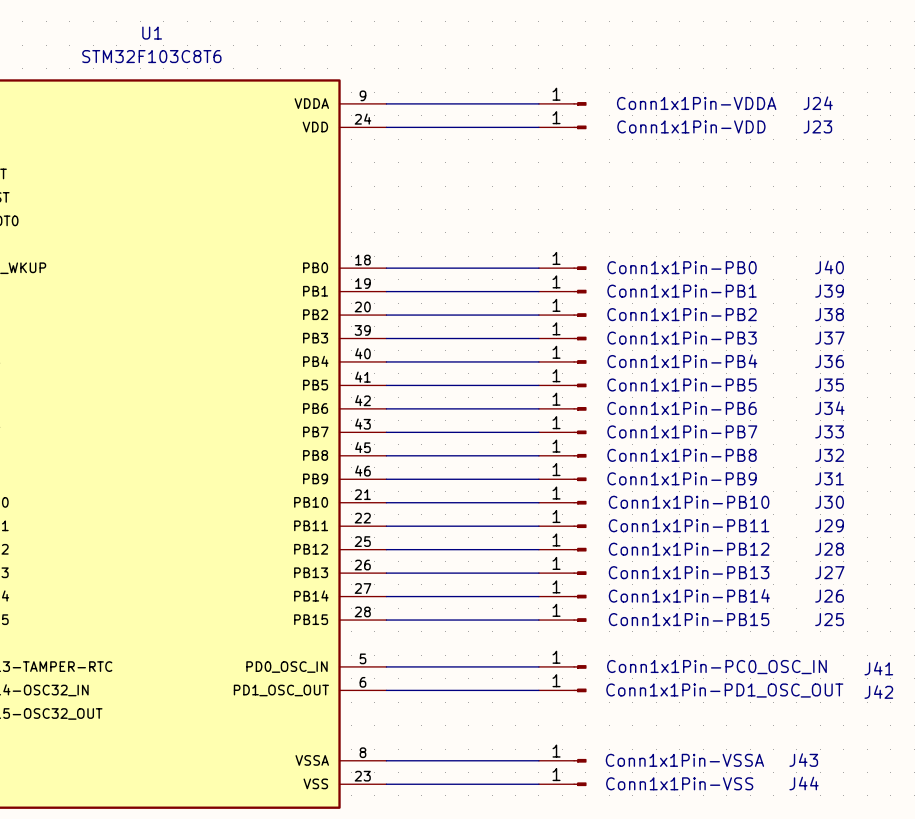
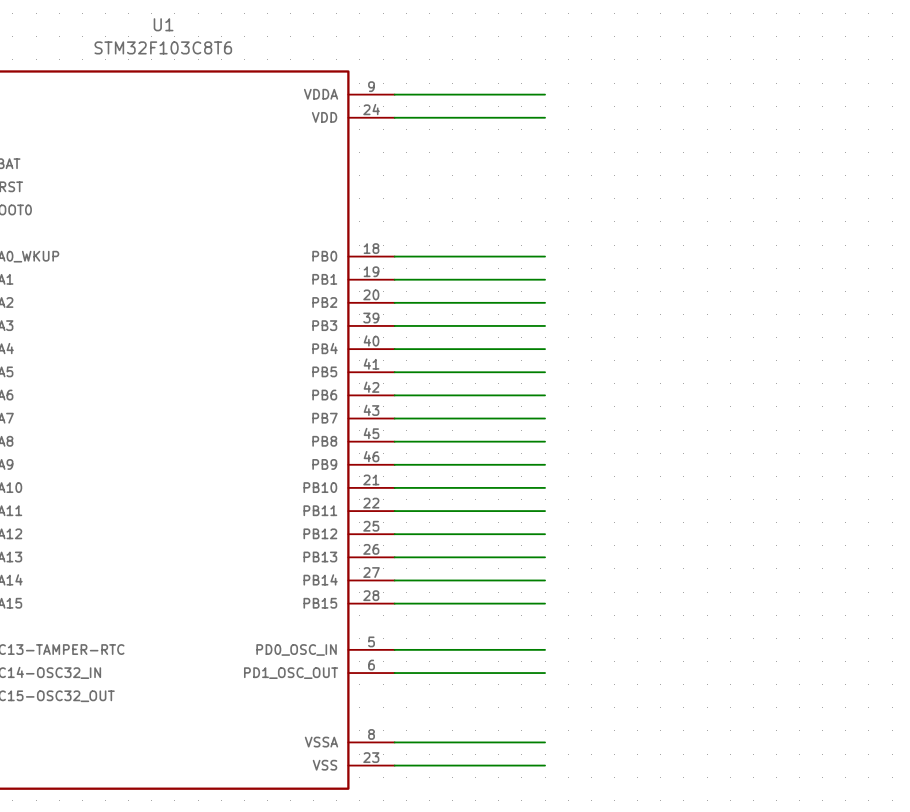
J24: Conn1x1Pin-VDDA (562, 103) -> none
J23: Conn1x1Pin-VDD (562, 127) -> none
J40: Conn1x1Pin-PB0 (562, 268) -> none
J39: Conn1x1Pin-PB1 (562, 291) -> none
J38: Conn1x1Pin-PB2 (562, 315) -> none
J37: Conn1x1Pin-PB3 (562, 338) -> none
J36: Conn1x1Pin-PB4 (562, 361) -> none
J35: Conn1x1Pin-PB5 (562, 385) -> none
J34: Conn1x1Pin-PB6 (562, 408) -> none
J33: Conn1x1Pin-PB7 (562, 432) -> none
J32: Conn1x1Pin-PB8 (562, 455) -> none
J31: Conn1x1Pin-PB9 (562, 479) -> none
J30: Conn1x1Pin-PB10 (562, 502) -> none
J29: Conn1x1Pin-PB11 (562, 526) -> none
J28: Conn1x1Pin-PB12 (562, 549) -> none
J27: Conn1x1Pin-PB13 (562, 573) -> none
J26: Conn1x1Pin-PB14 (562, 596) -> none
J25: Conn1x1Pin-PB15 (562, 620) -> none
J41: Conn1x1Pin-PC0_OSC_IN (562, 666) -> none
J42: Conn1x1Pin-PD1_OSC_OUT (562, 690) -> none
J43: Conn1x1Pin-VSSA (562, 760) -> none
J44: Conn1x1Pin-VSS (562, 784) -> none

